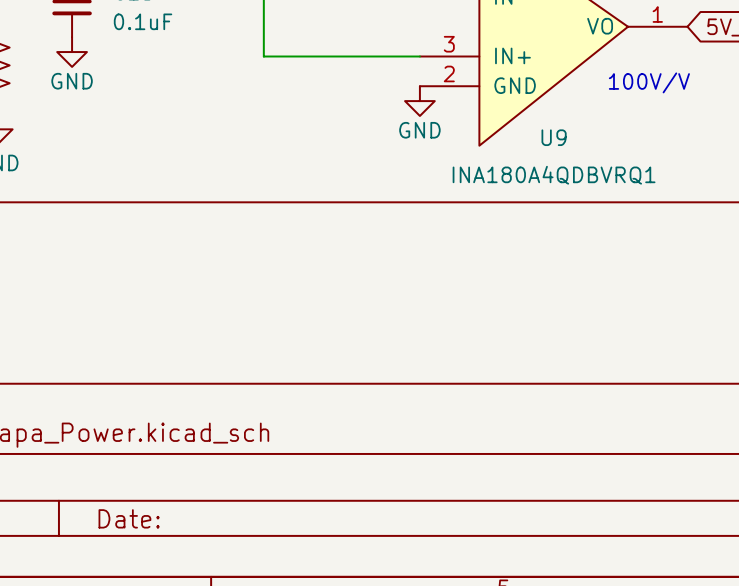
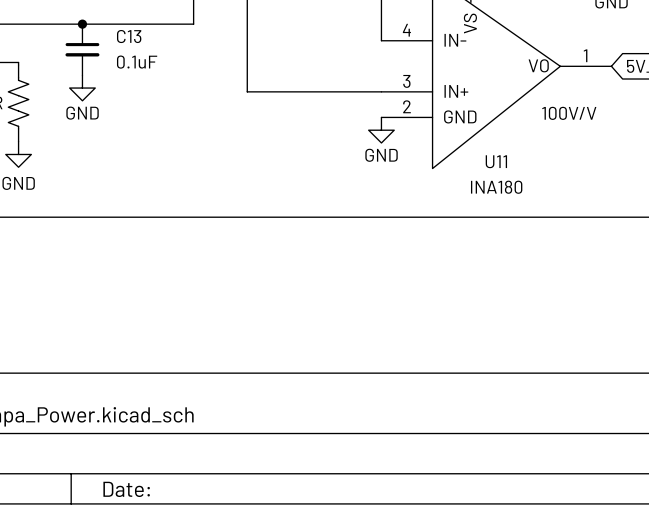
U9 name: U9 (554, 137) -> U11 (496, 161)
U9 value: INA180A4QDBVRQ1 (554, 175) -> INA180 (496, 187)

